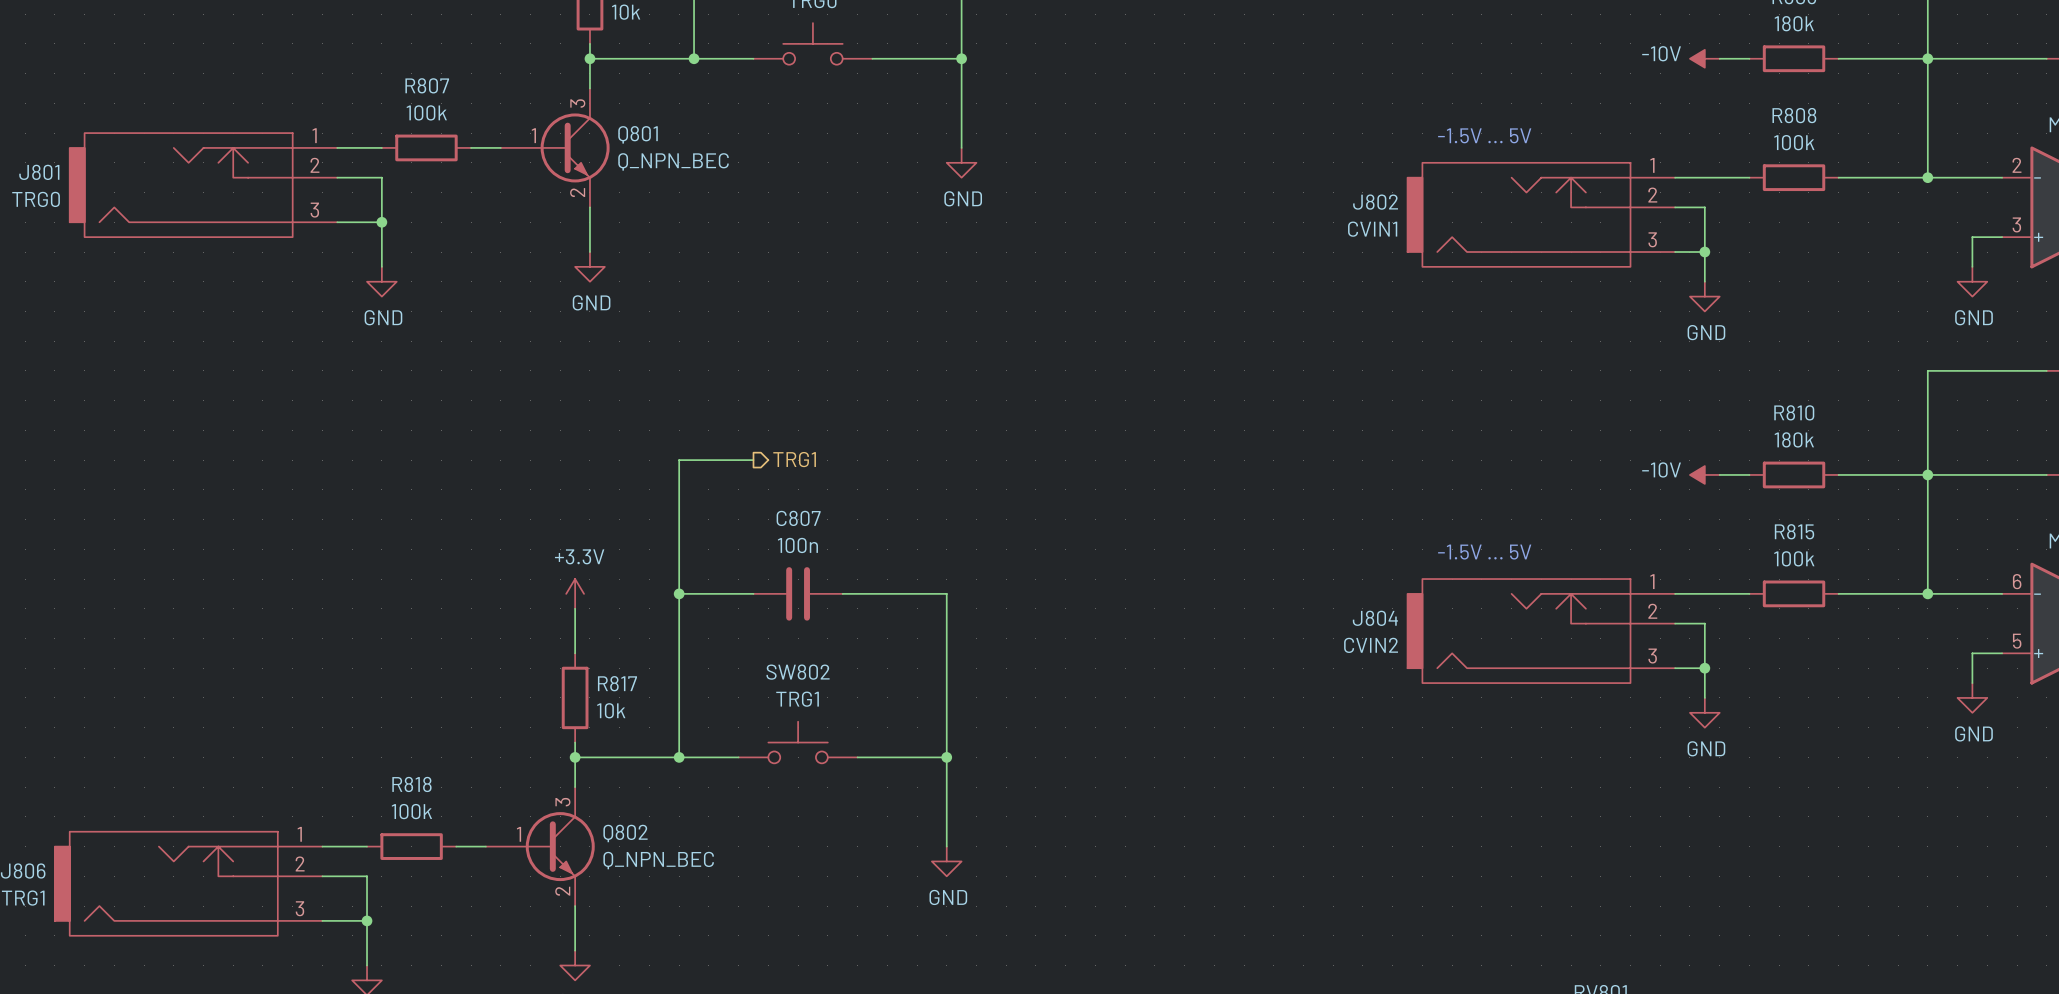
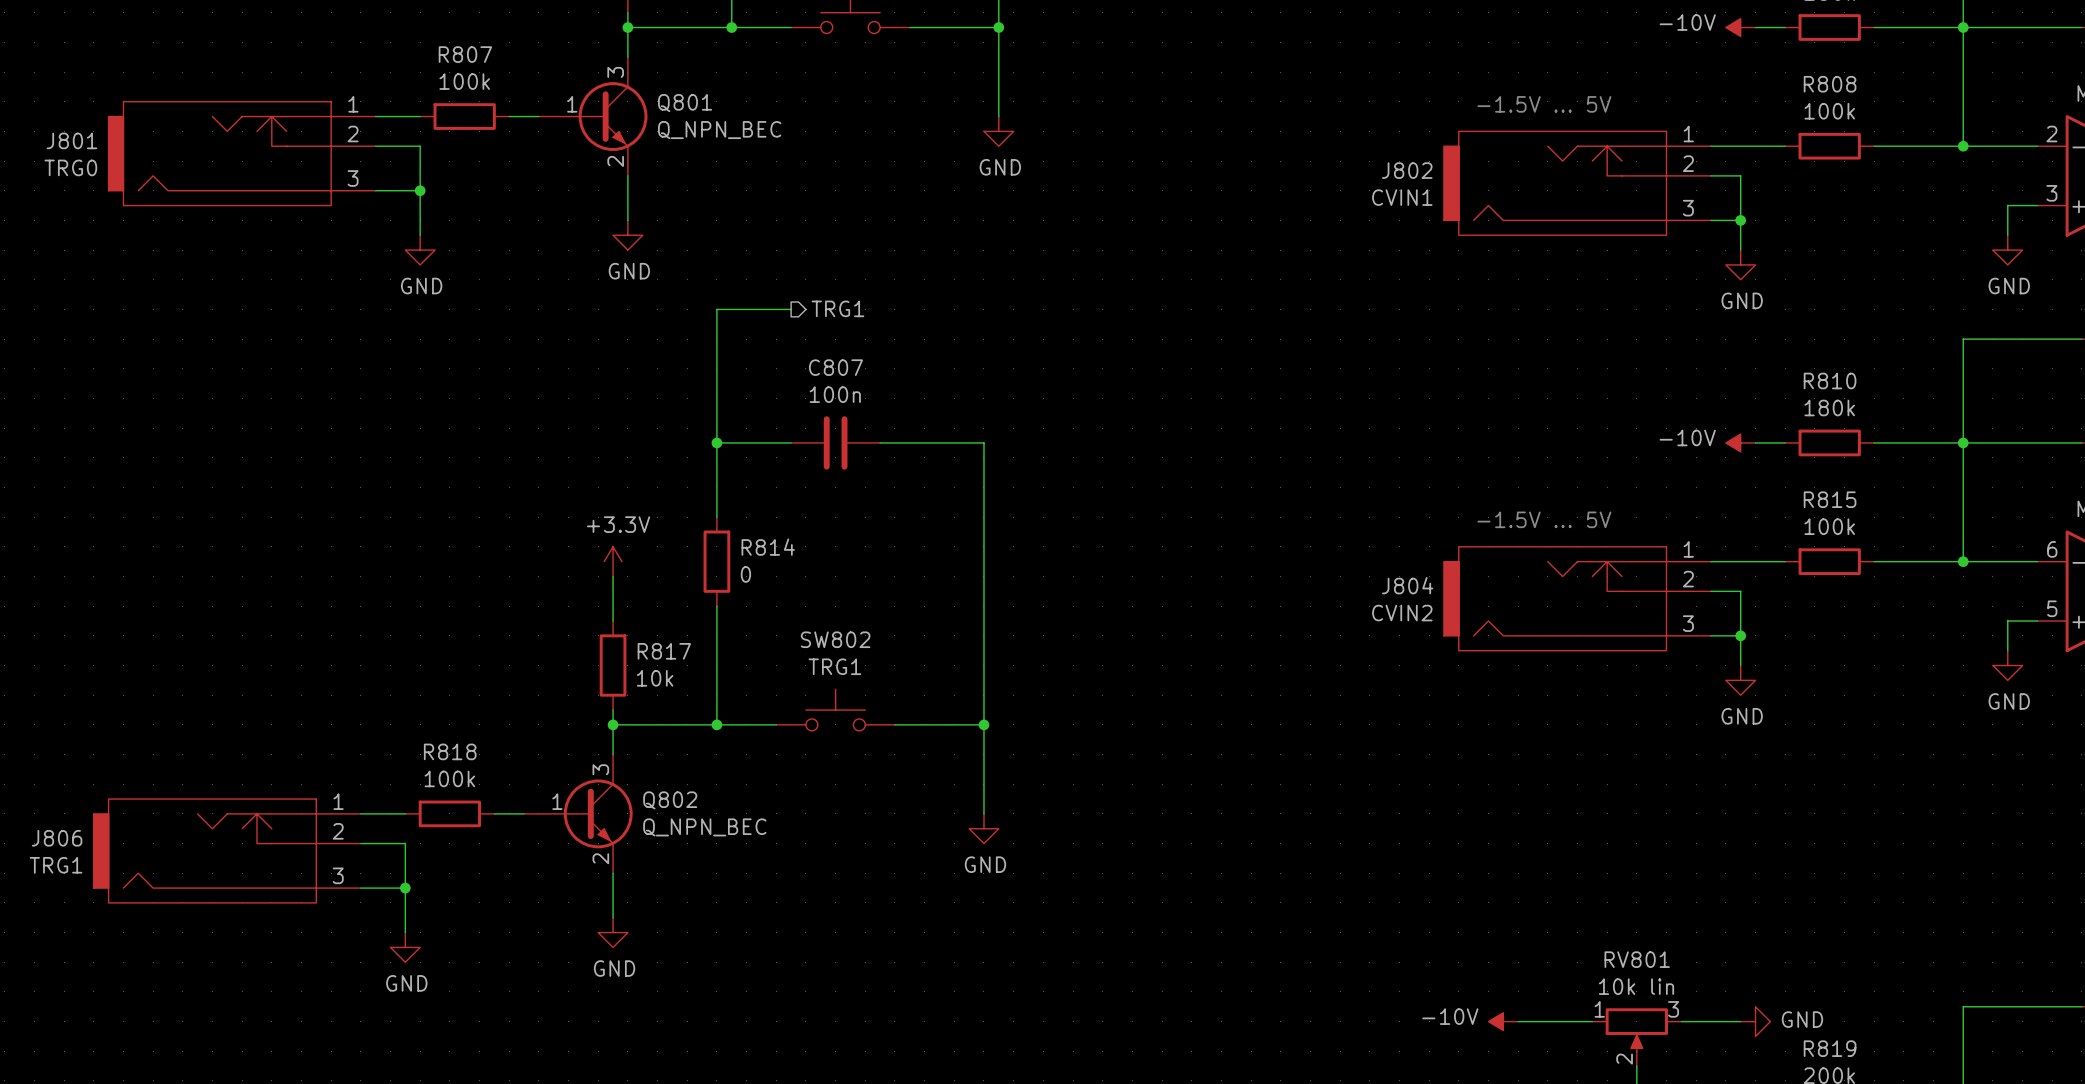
hierarchical label position: TRG1 (794, 459) -> TRG1 (837, 308)
wire: (679, 460) (753, 460) -> (716, 428) (716, 309) (791, 309)
junction: none -> (716, 442)
wire: (679, 549) (679, 638) -> none
wire: (679, 593) (753, 593) -> (716, 442) (791, 442)
R814: none -> 0 (716, 561)
junction: (679, 593) -> none
C807 position: (798, 593) -> (835, 442)
wire: (842, 593) (946, 593) -> (880, 442) (983, 442) (983, 561)

